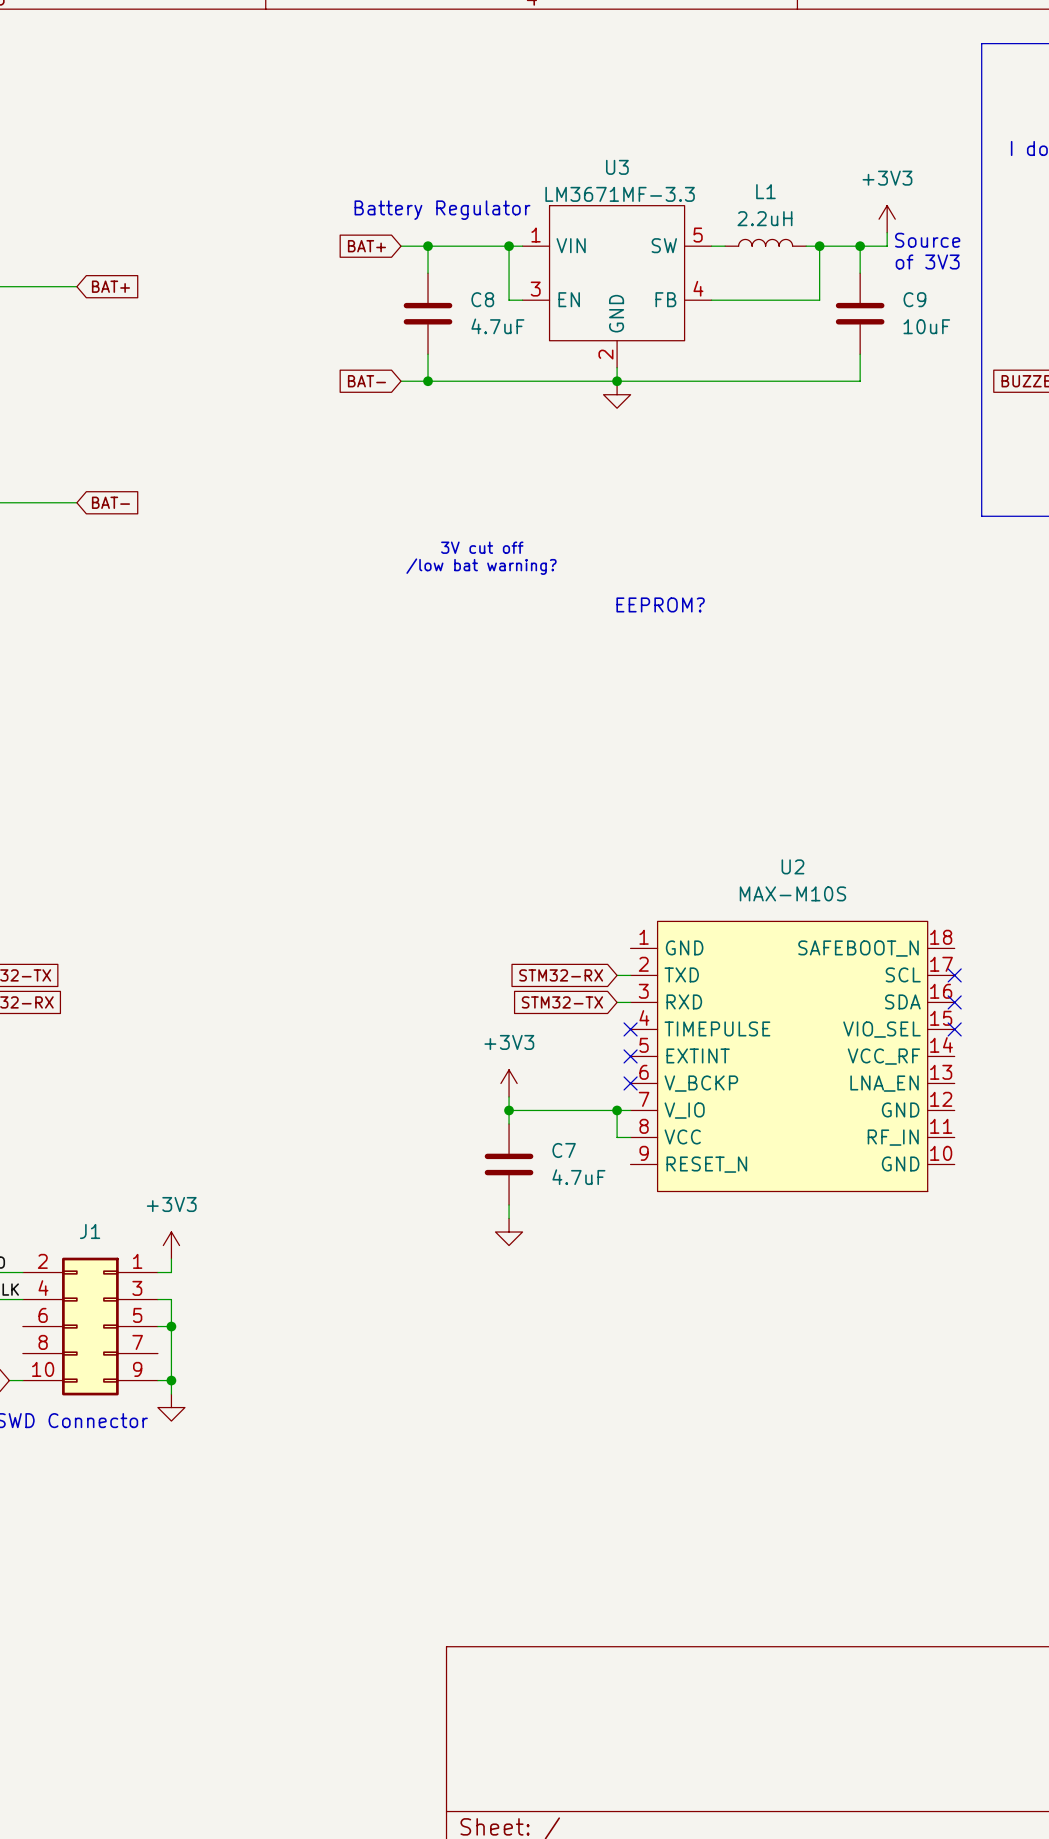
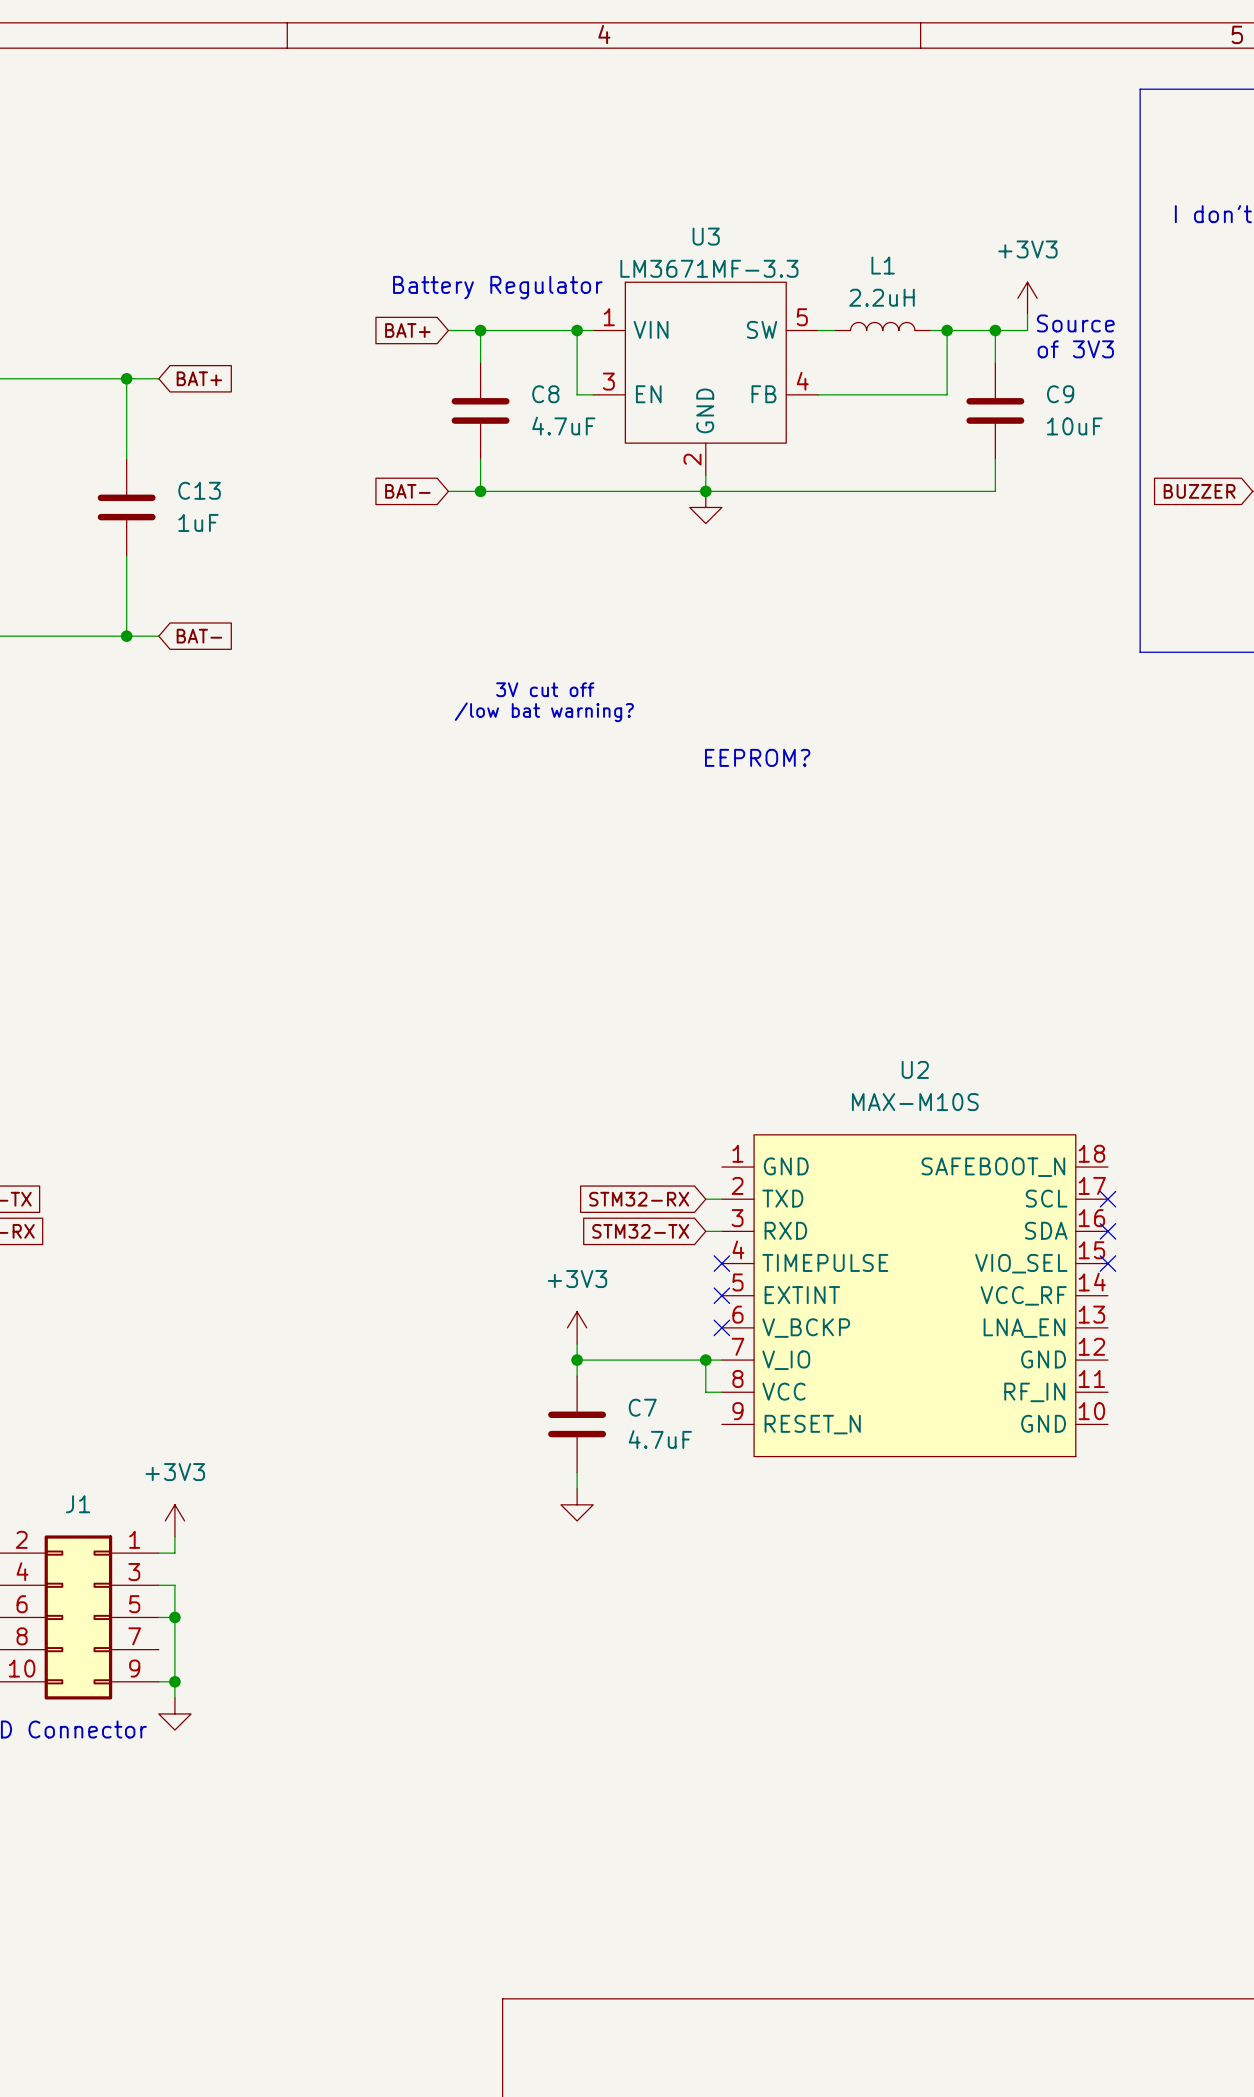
wire: none -> (62, 378) (158, 378)
global label position: BAT+ (110, 286) -> BAT+ (199, 378)
wire: none -> (126, 378) (126, 459)
junction: none -> (126, 378)
C13: none -> 1uF (126, 507)
wire: none -> (126, 555) (126, 636)
wire: none -> (62, 636) (158, 636)
global label position: BAT- (110, 502) -> BAT- (199, 636)
junction: none -> (126, 636)

